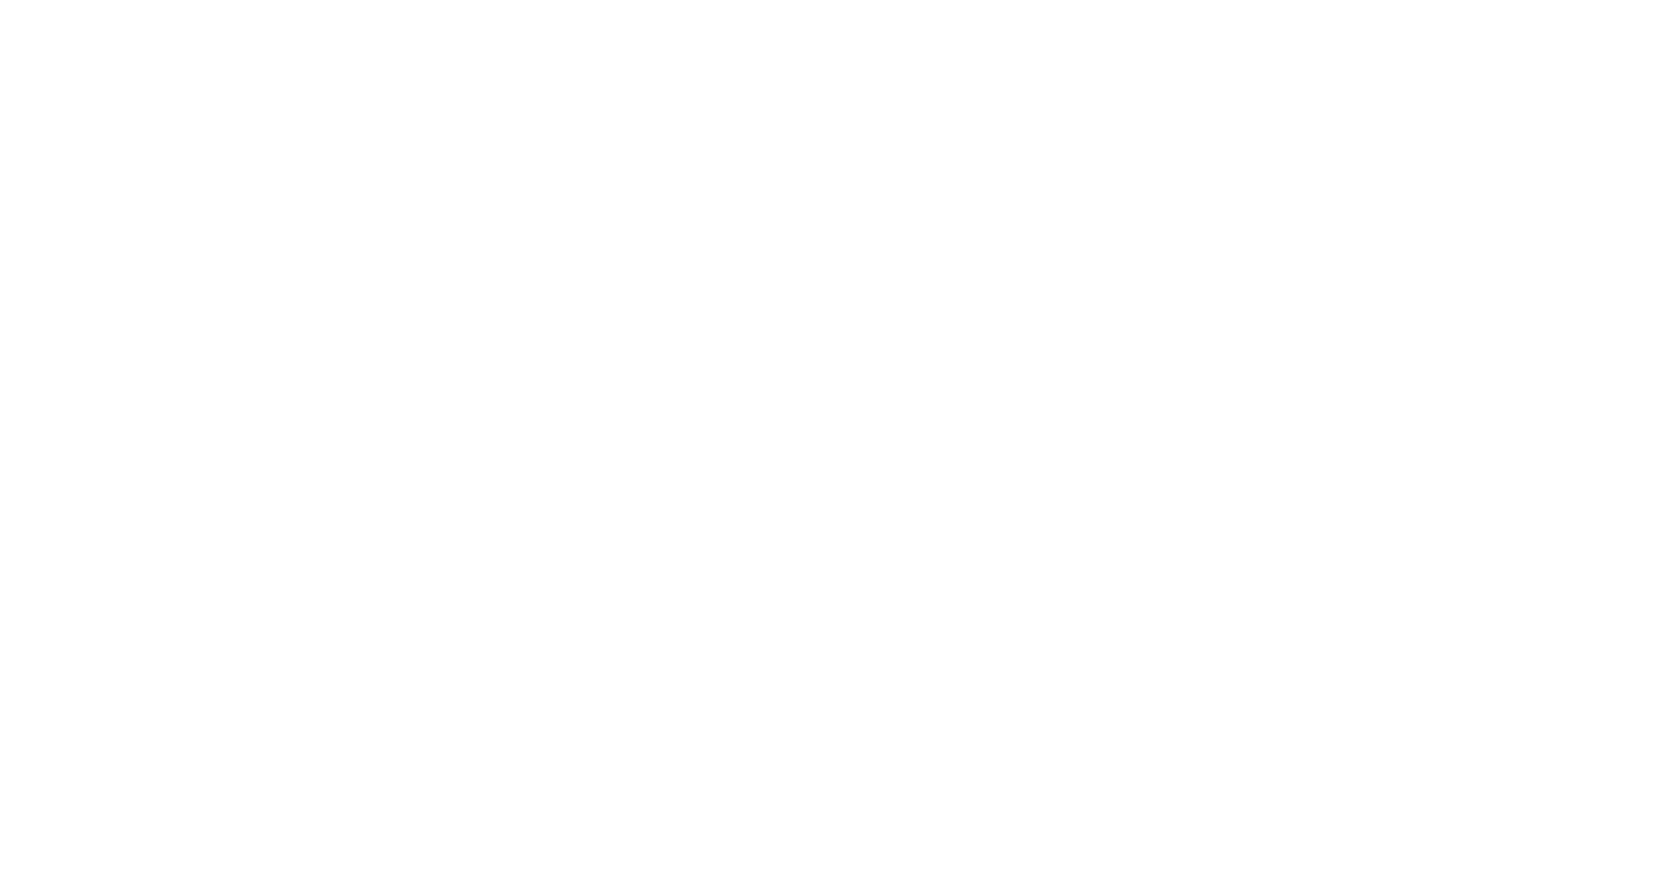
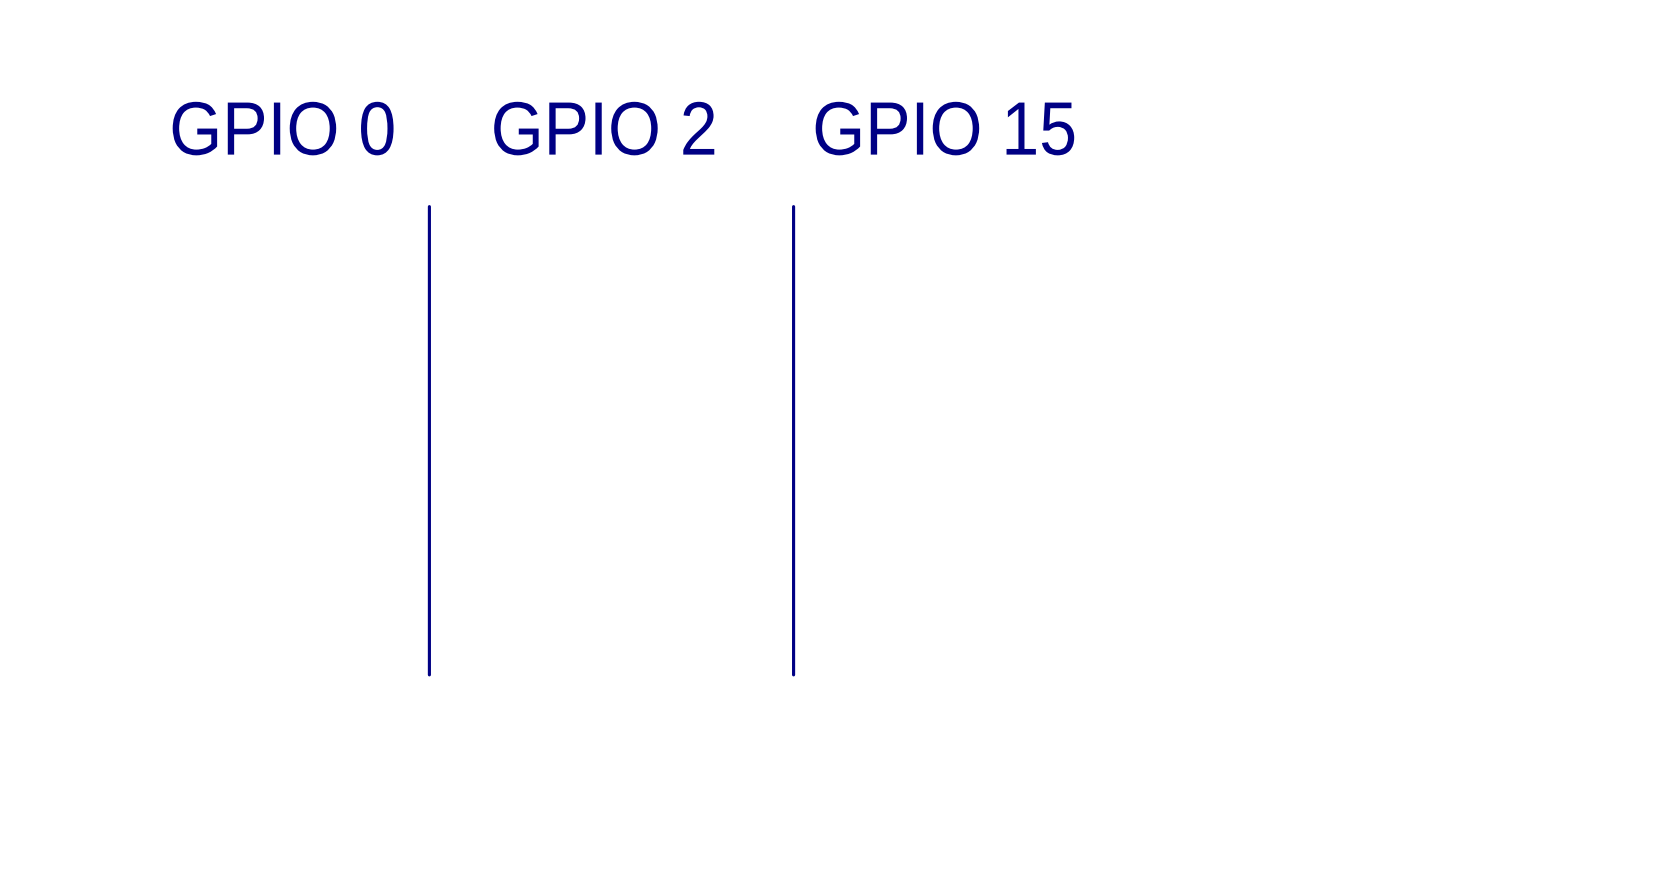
text: none -> GPIO 0 GPIO 2 GPIO 15 (623, 128)
line: none -> (429, 206) (429, 674)
line: none -> (793, 206) (793, 674)

